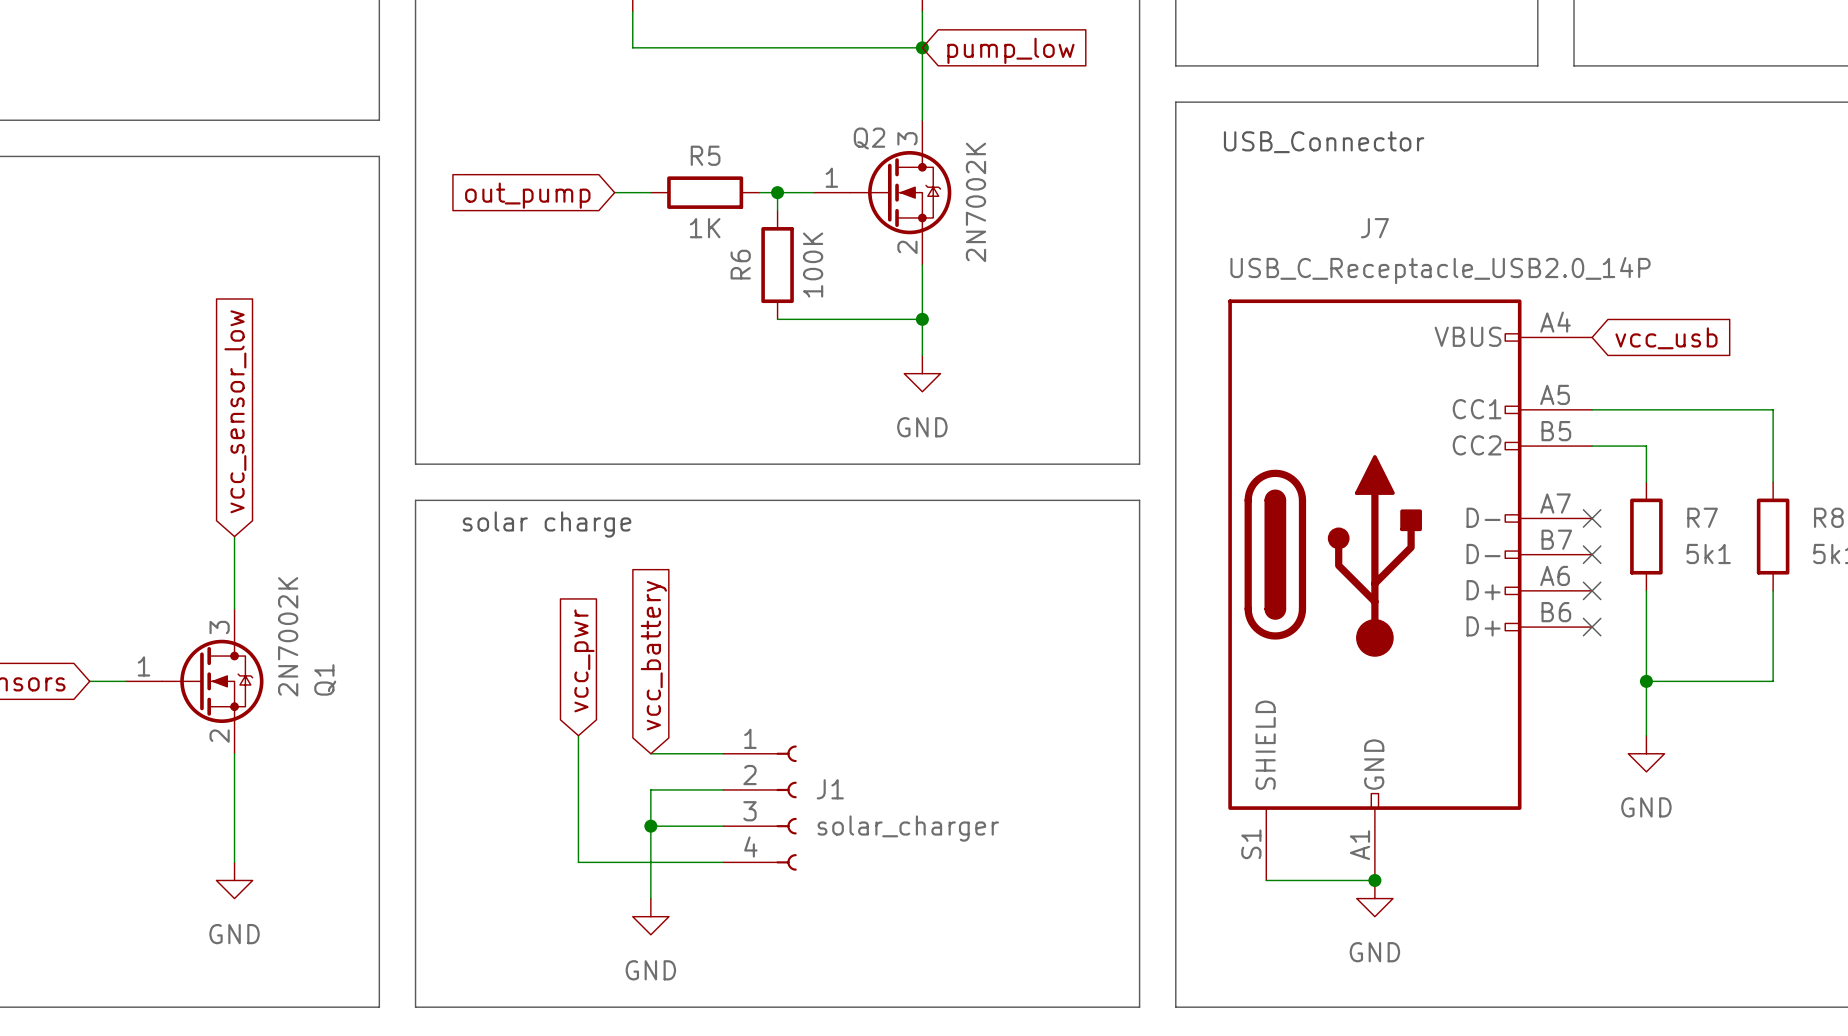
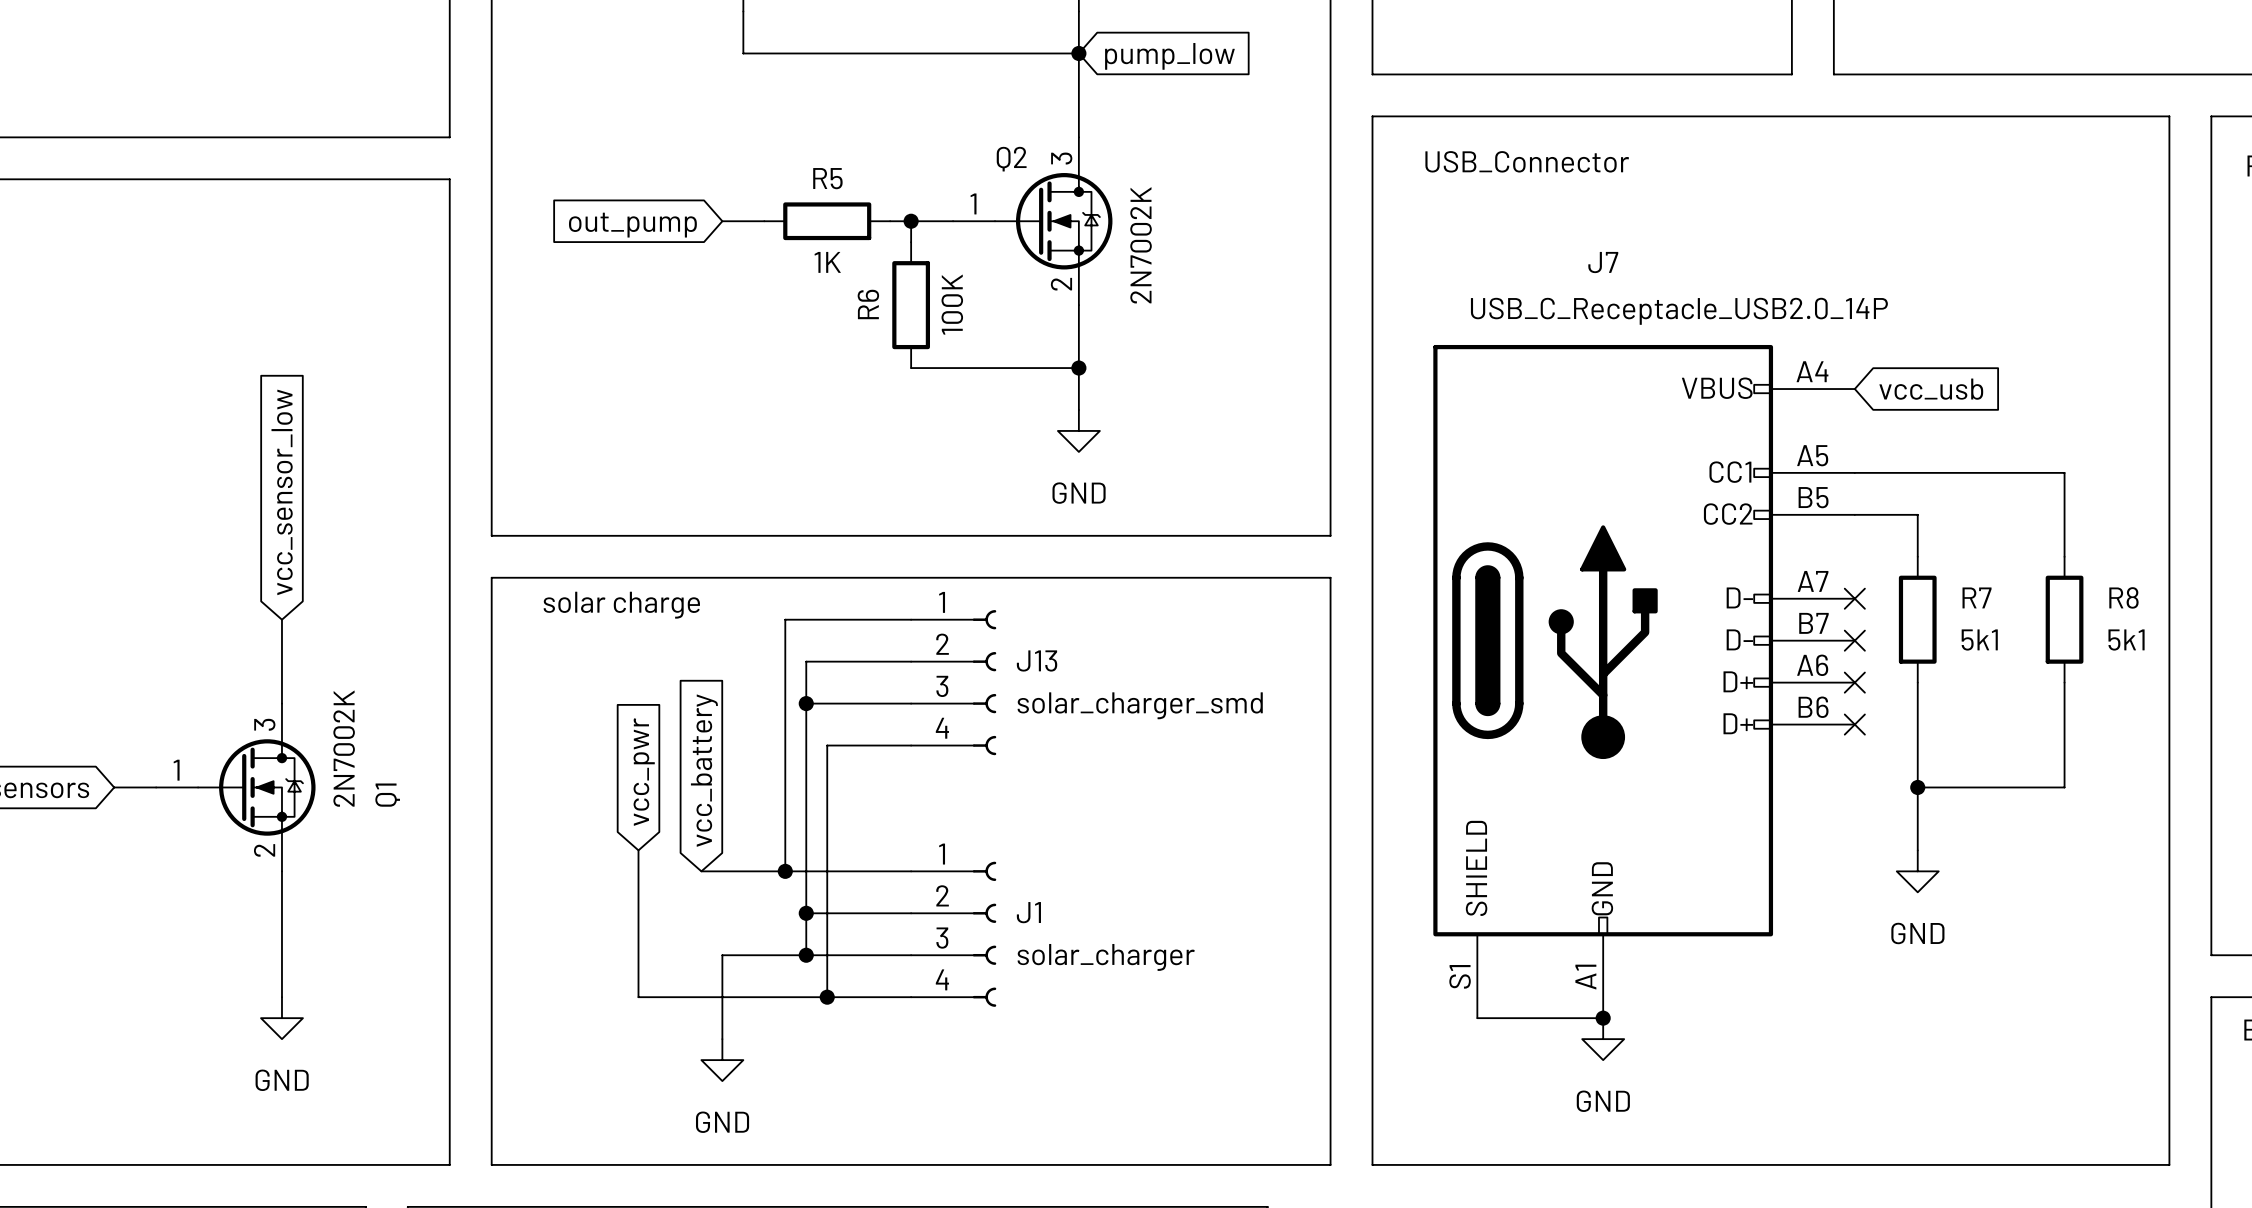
wire: none -> (911, 619) (785, 619) (785, 871)
wire: none -> (911, 661) (806, 661) (806, 955)
J13: none -> solar_charger_smd (953, 682)
wire: none -> (806, 703) (911, 703)
junction: none -> (806, 703)
wire: none -> (911, 745) (827, 745) (827, 997)
global label position: vcc_battery (653, 655) -> vcc_battery (704, 770)
global label position: vcc_pwr (584, 660) -> vcc_pwr (644, 772)
wire: (578, 735) (578, 862) -> (638, 850) (638, 997) (680, 997)
wire: none -> (701, 871) (764, 871)
junction: none -> (785, 871)
wire: (687, 789) (650, 789) (650, 898) -> none
junction: none -> (806, 913)
J1 position: (760, 808) -> (953, 934)
wire: none -> (764, 955) (722, 955) (722, 1039)
junction: (650, 826) -> none
junction: none -> (806, 955)
junction: none -> (827, 997)
power symbol position: GND (650, 916) -> GND (722, 1060)

